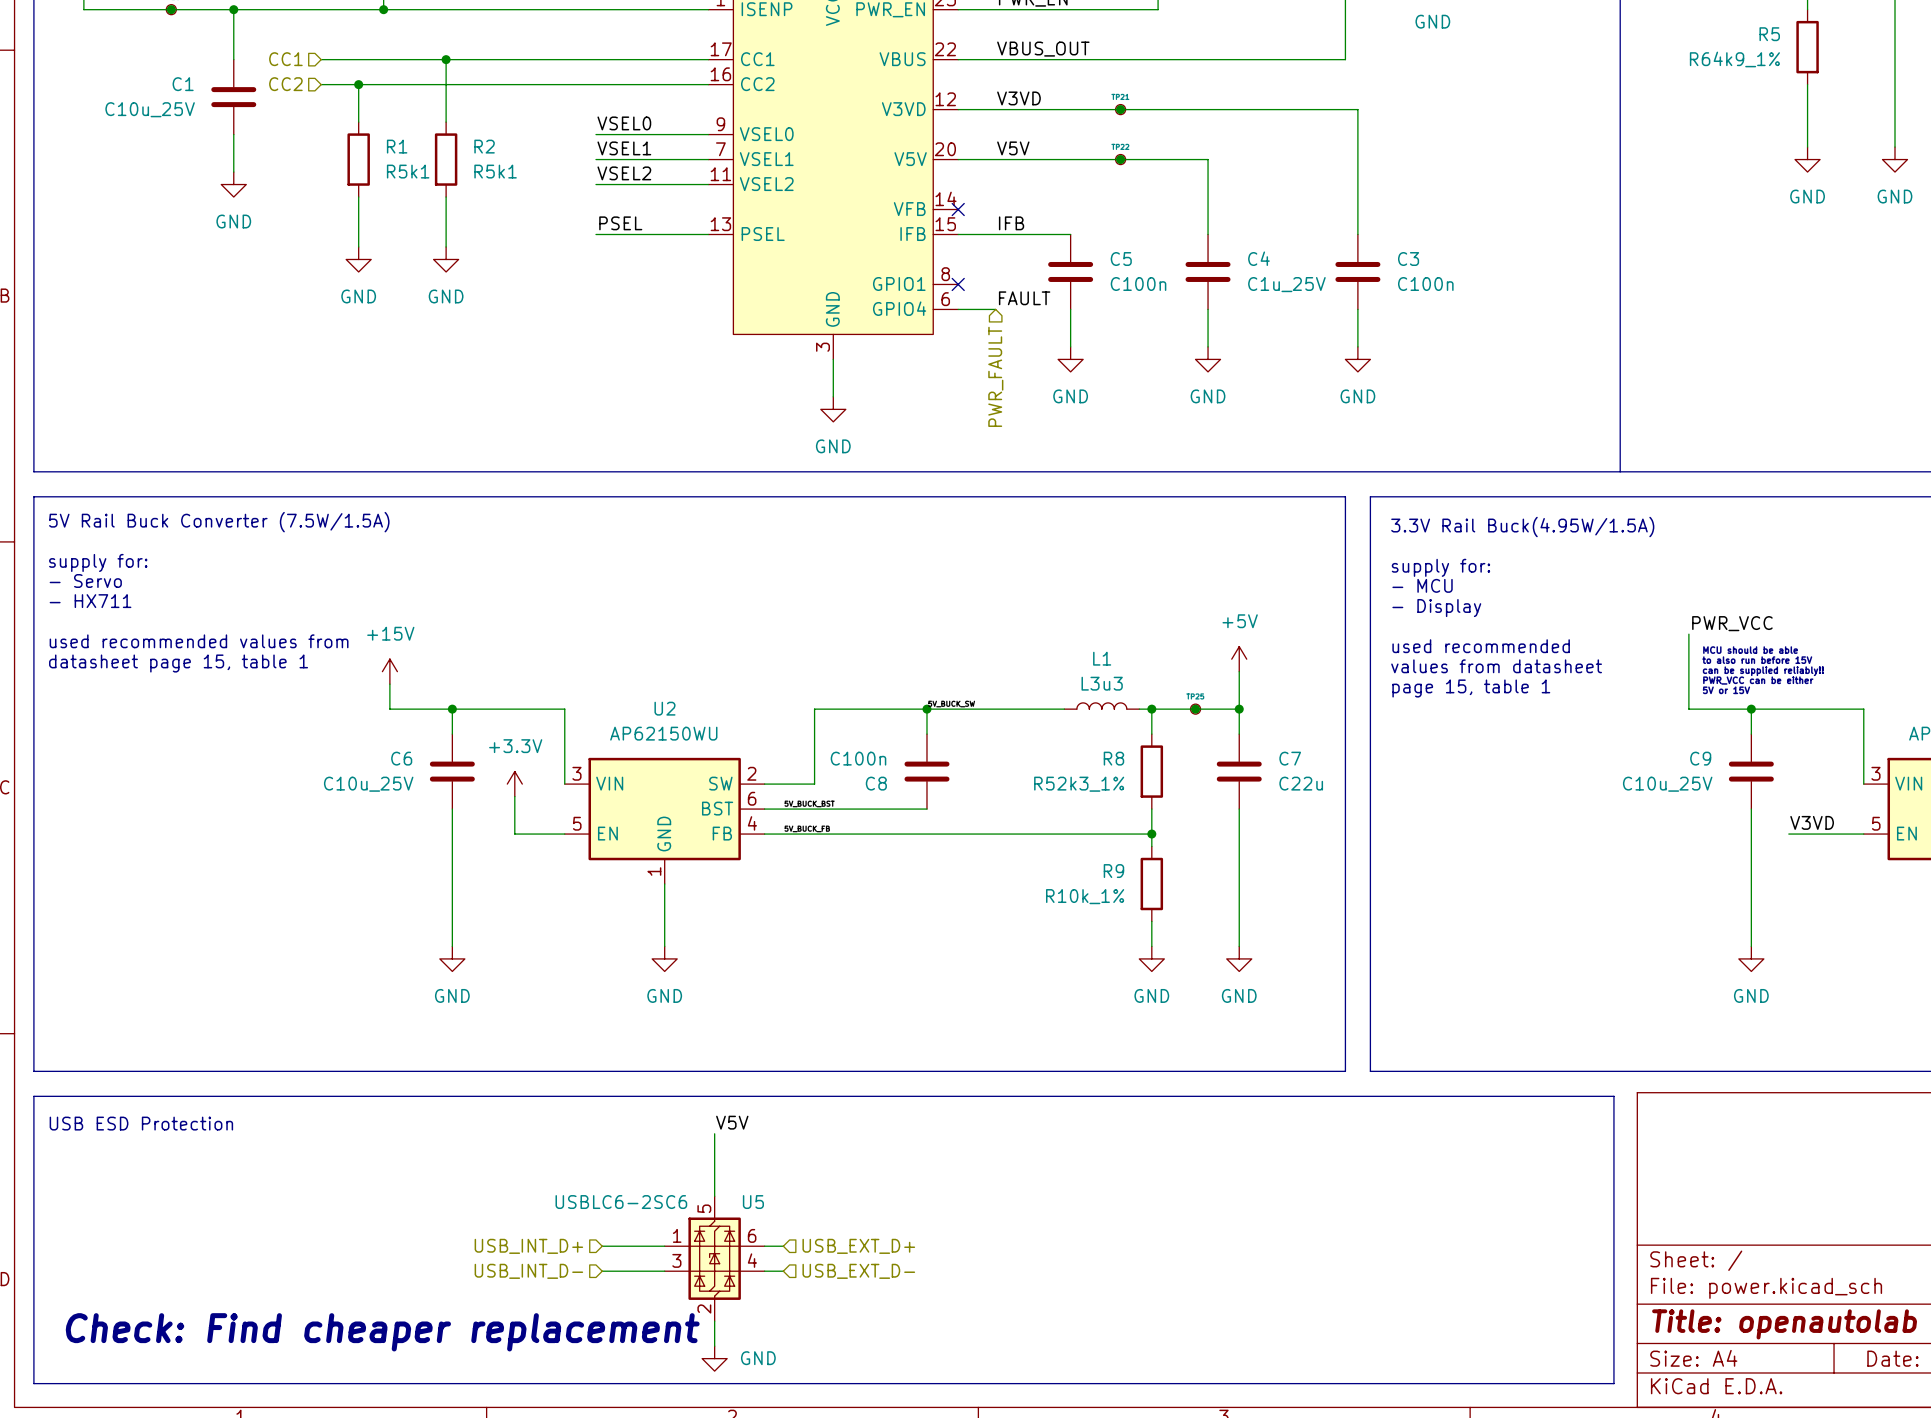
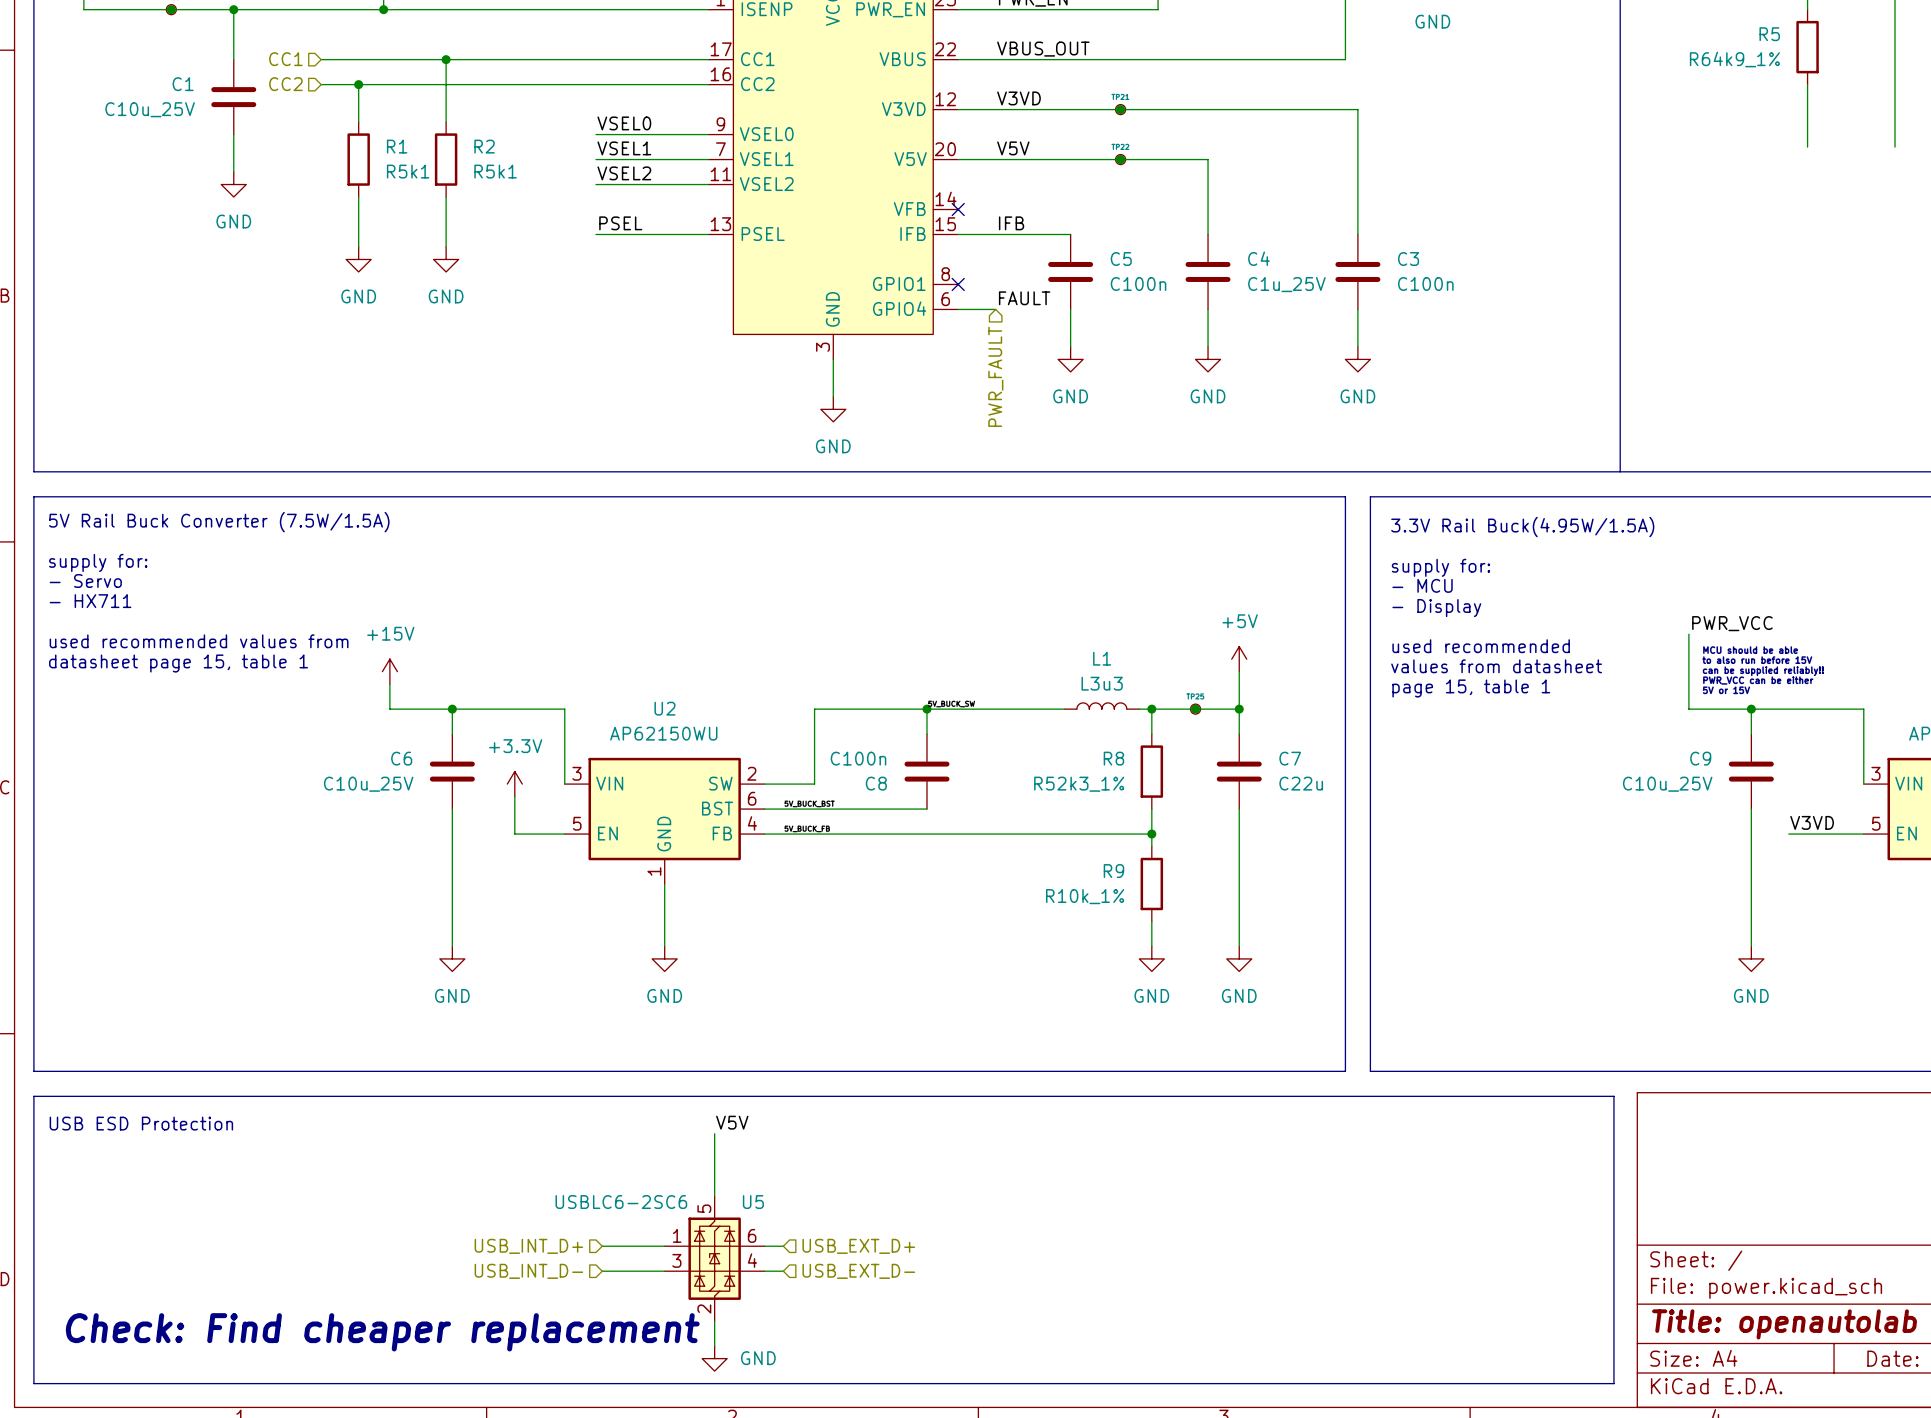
power symbol: GND (1807, 159) -> none
power symbol: GND (1894, 159) -> none

